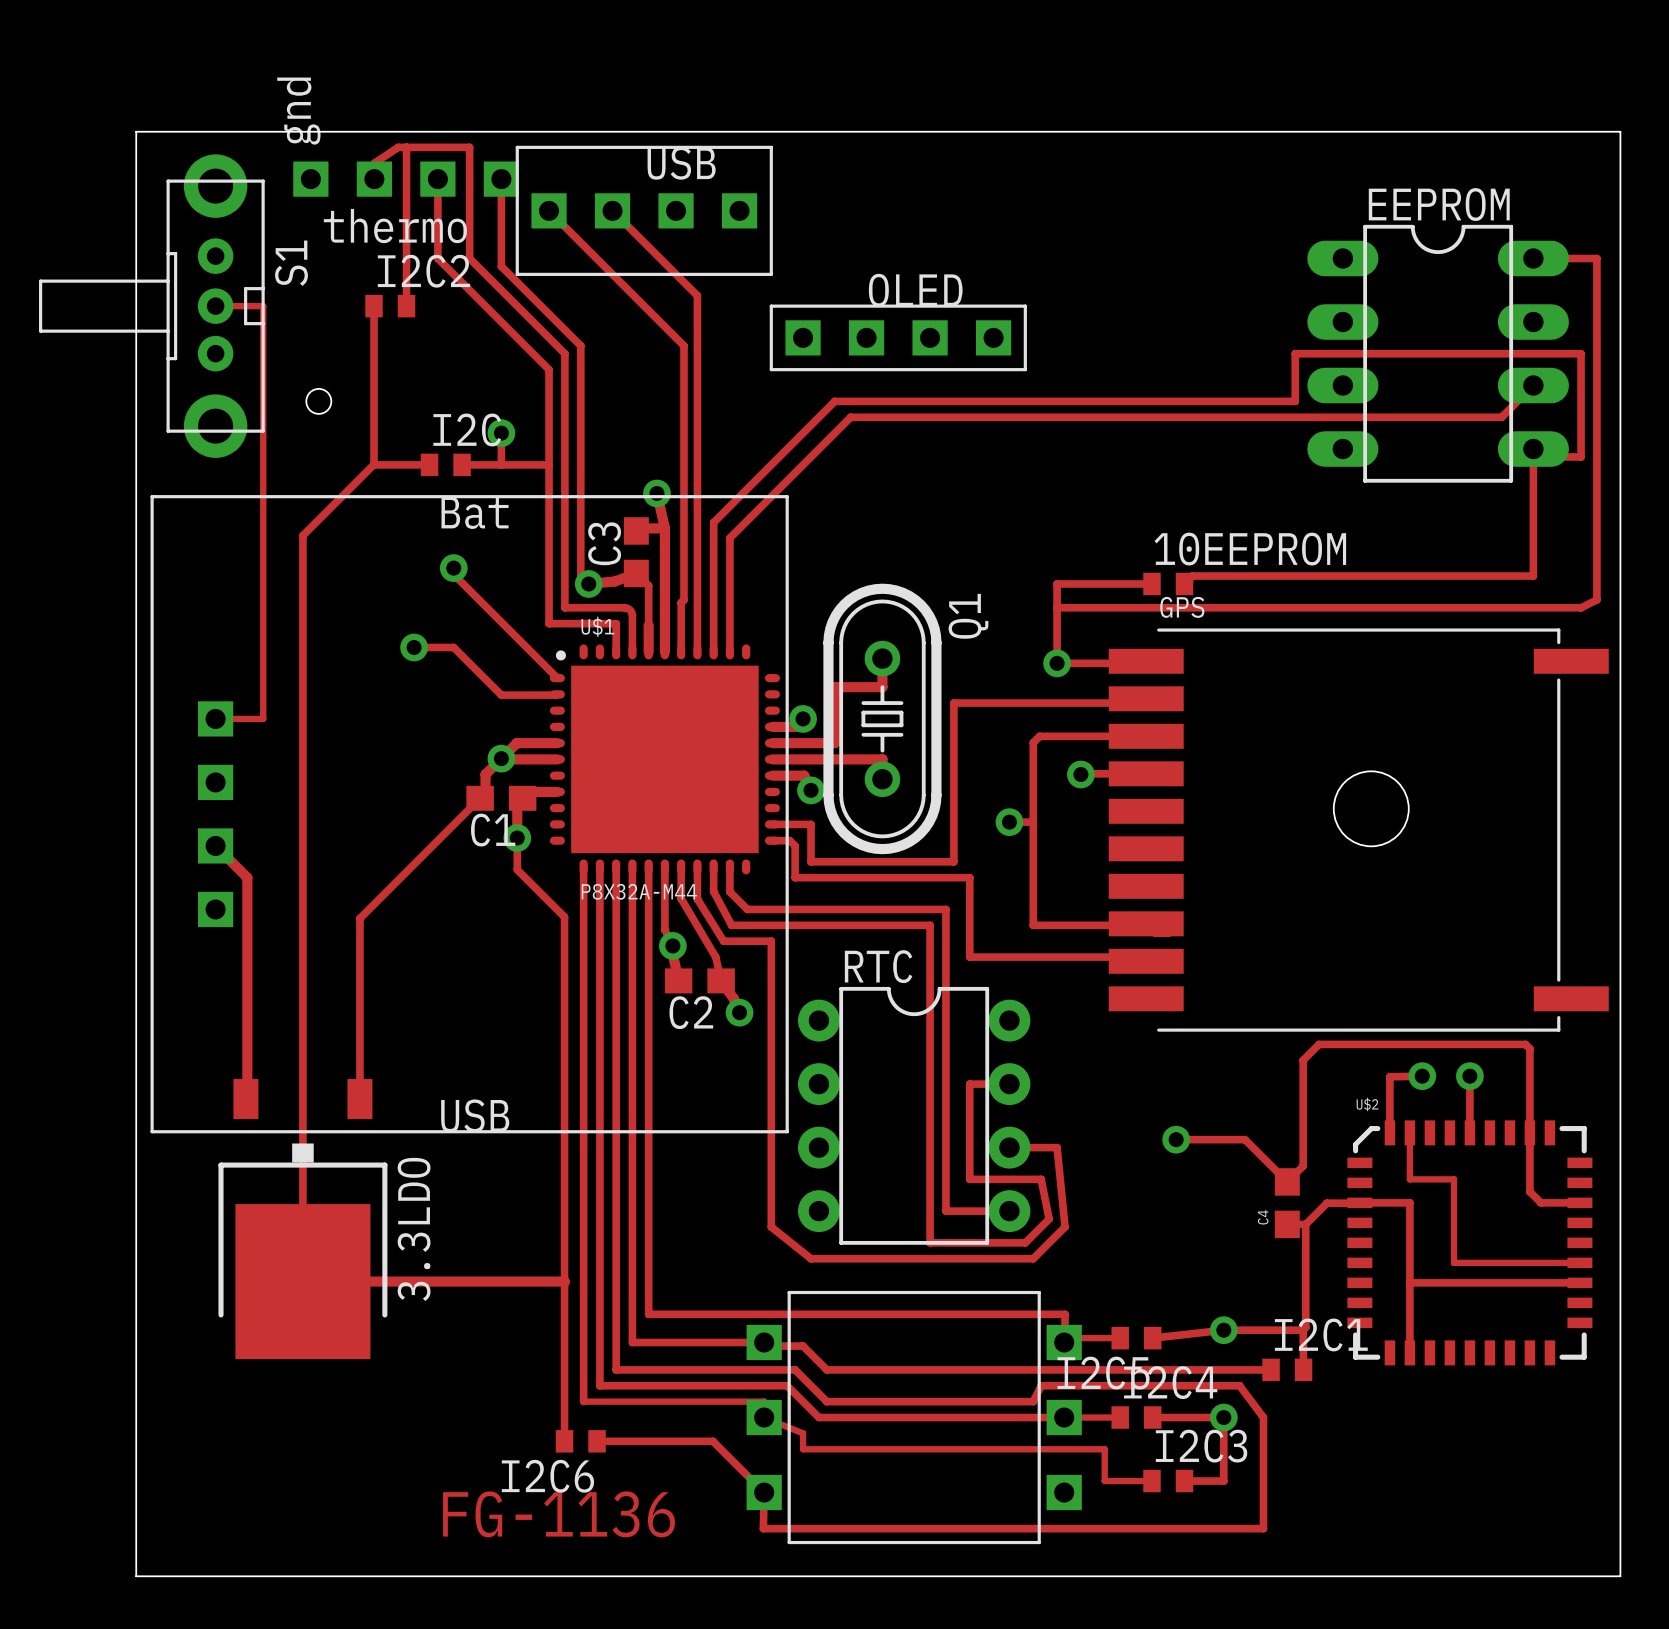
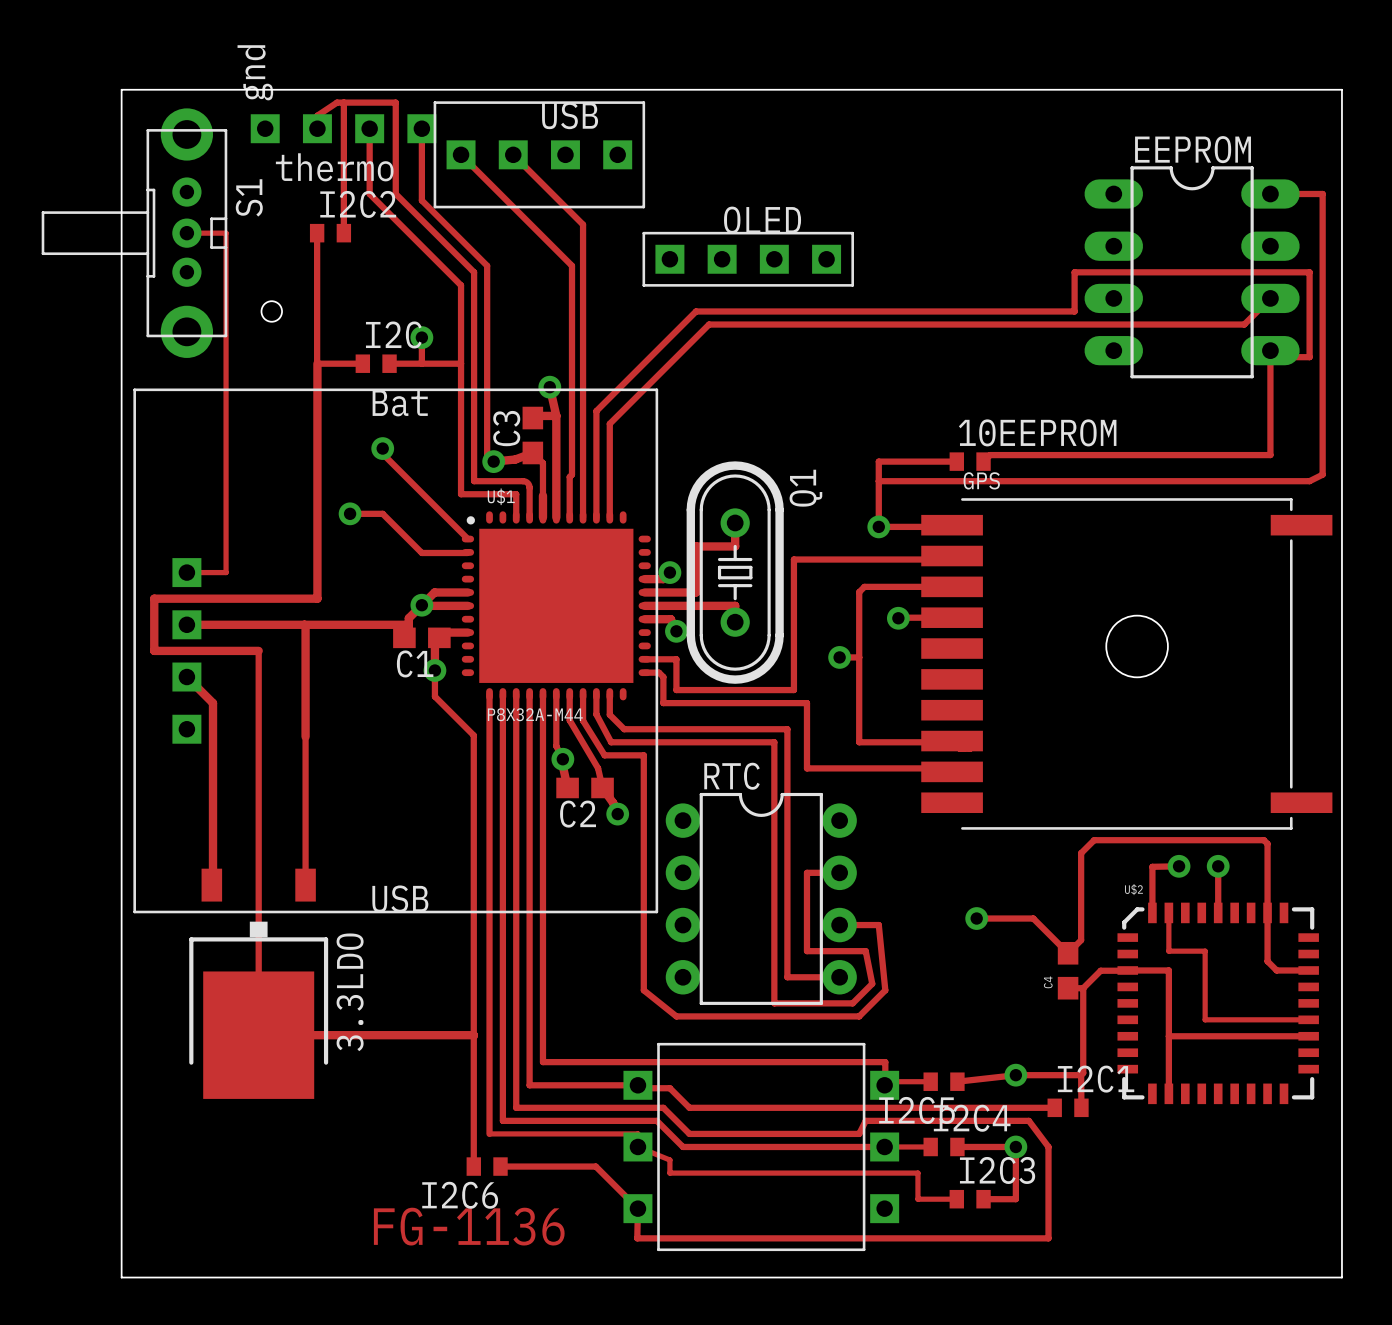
track: (374, 464) (302, 535) (302, 814) -> (317, 363) (317, 598) (154, 598) (154, 650) (258, 650)
track: none -> (186, 624) (408, 624)
track: (480, 798) (359, 918) -> (304, 624) (305, 736)

